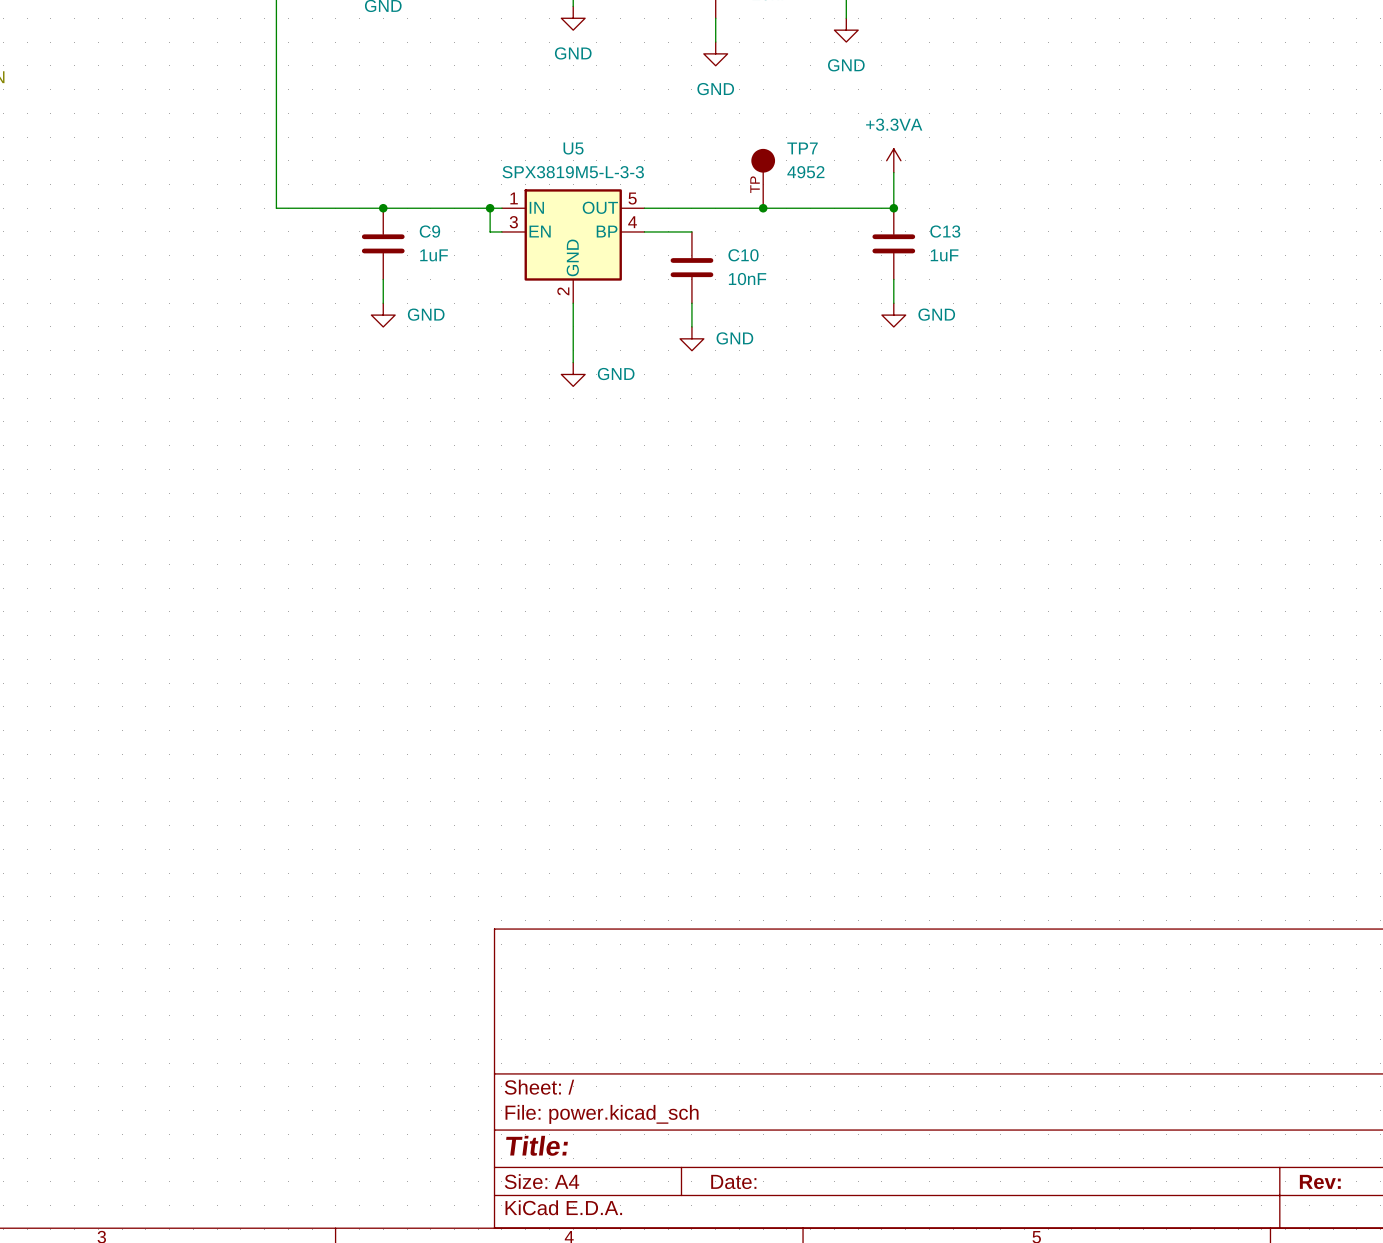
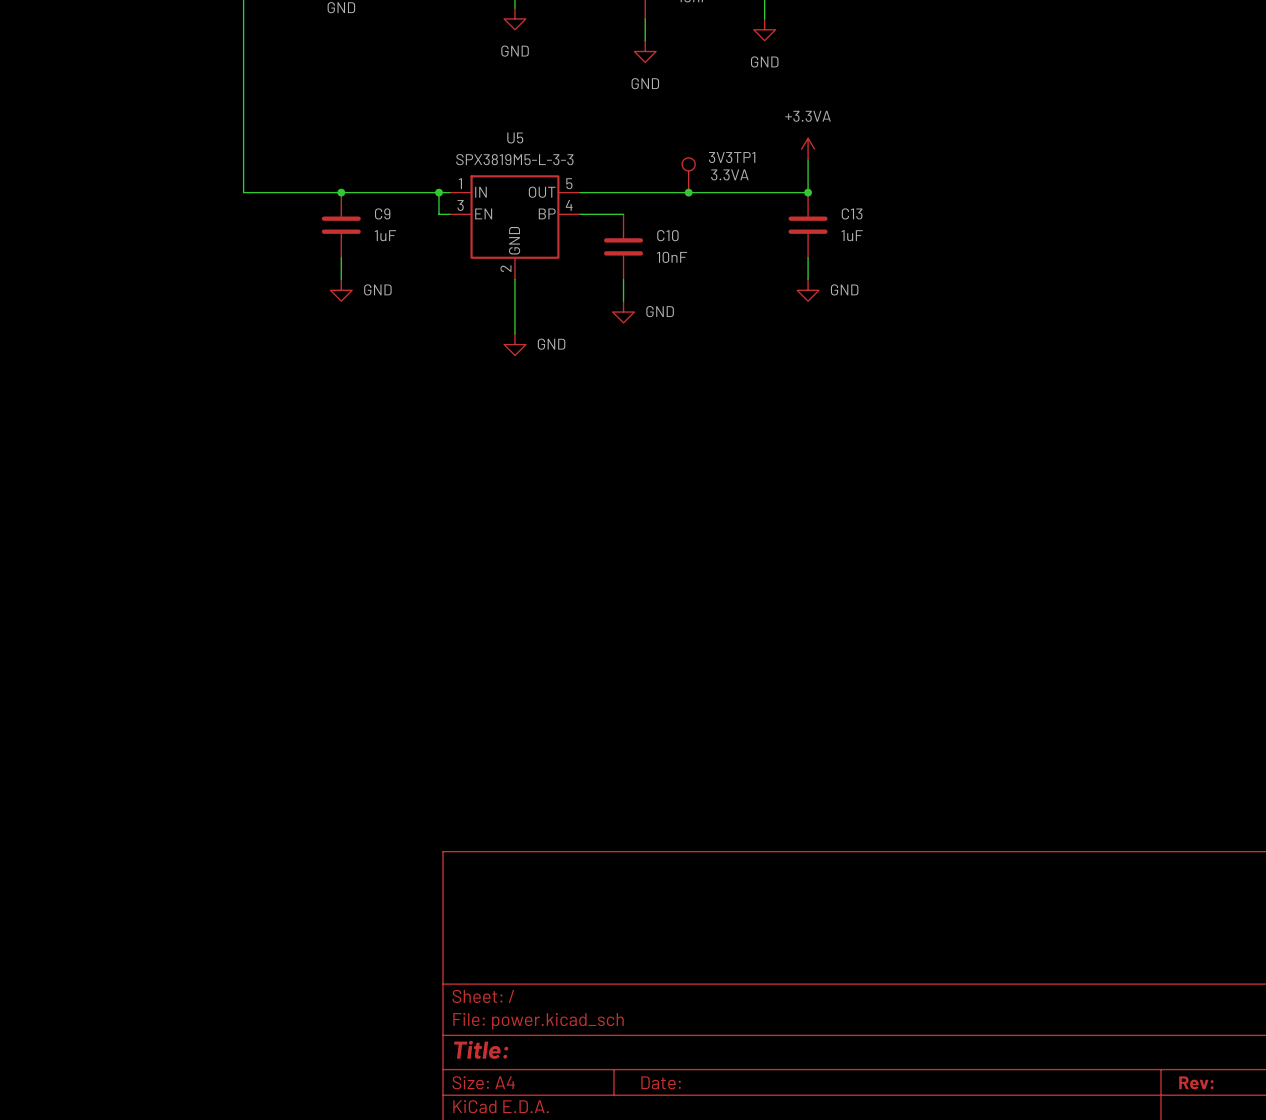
TP7: 4952 (763, 178) -> none
3V3TP1: none -> 3.3VA (688, 175)

